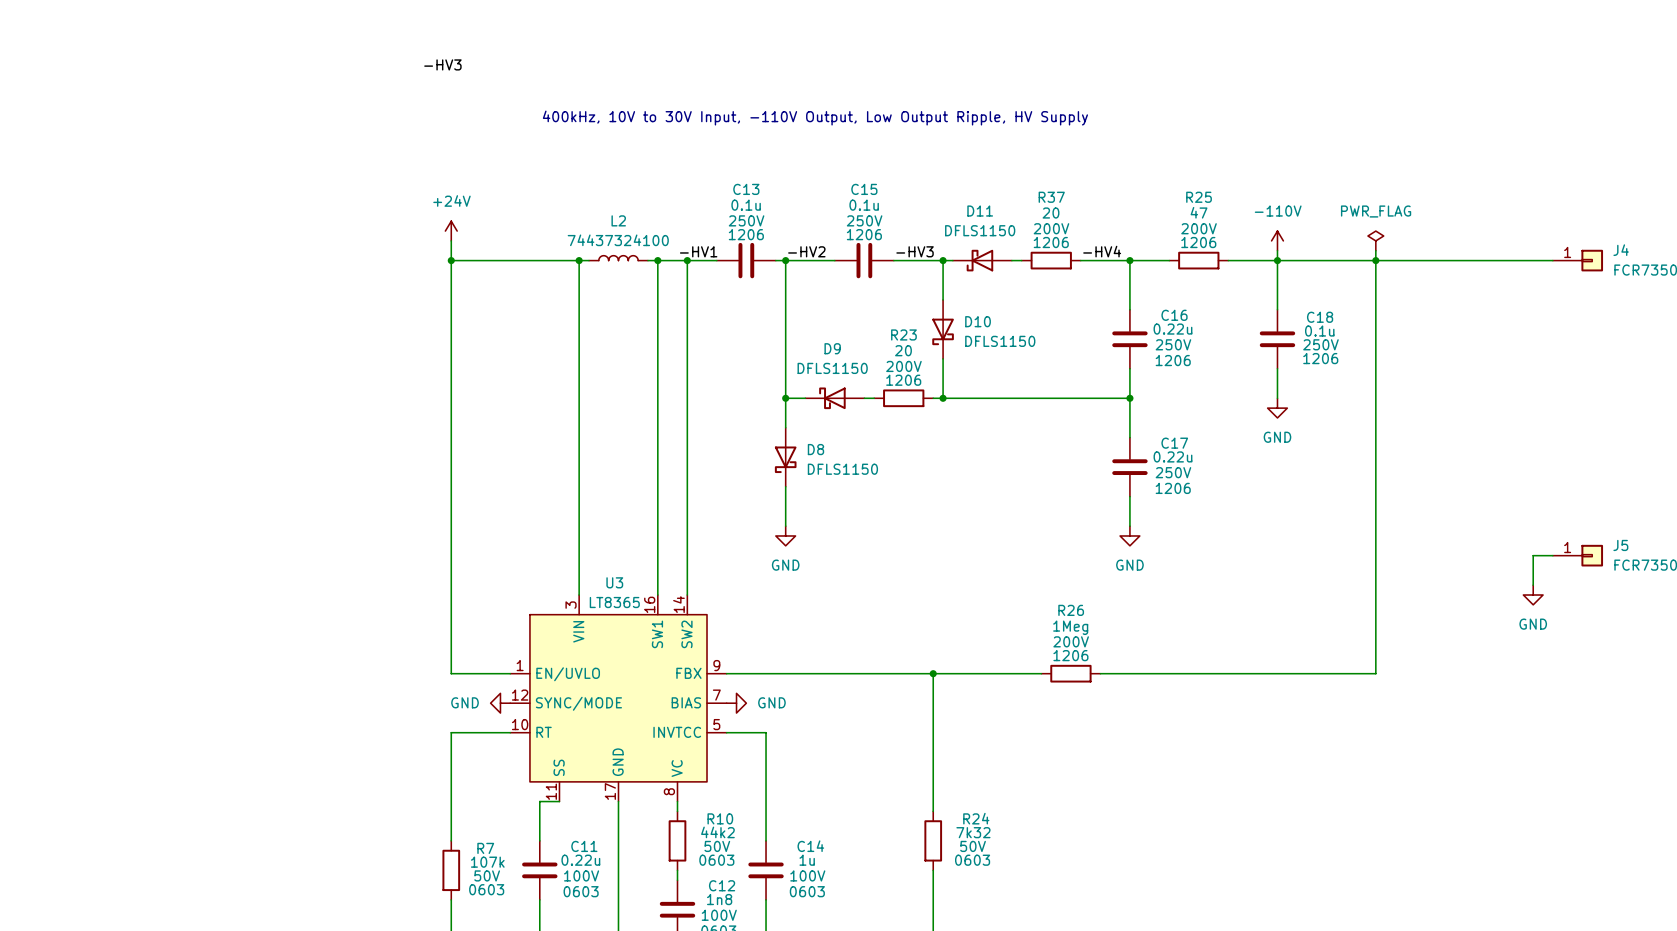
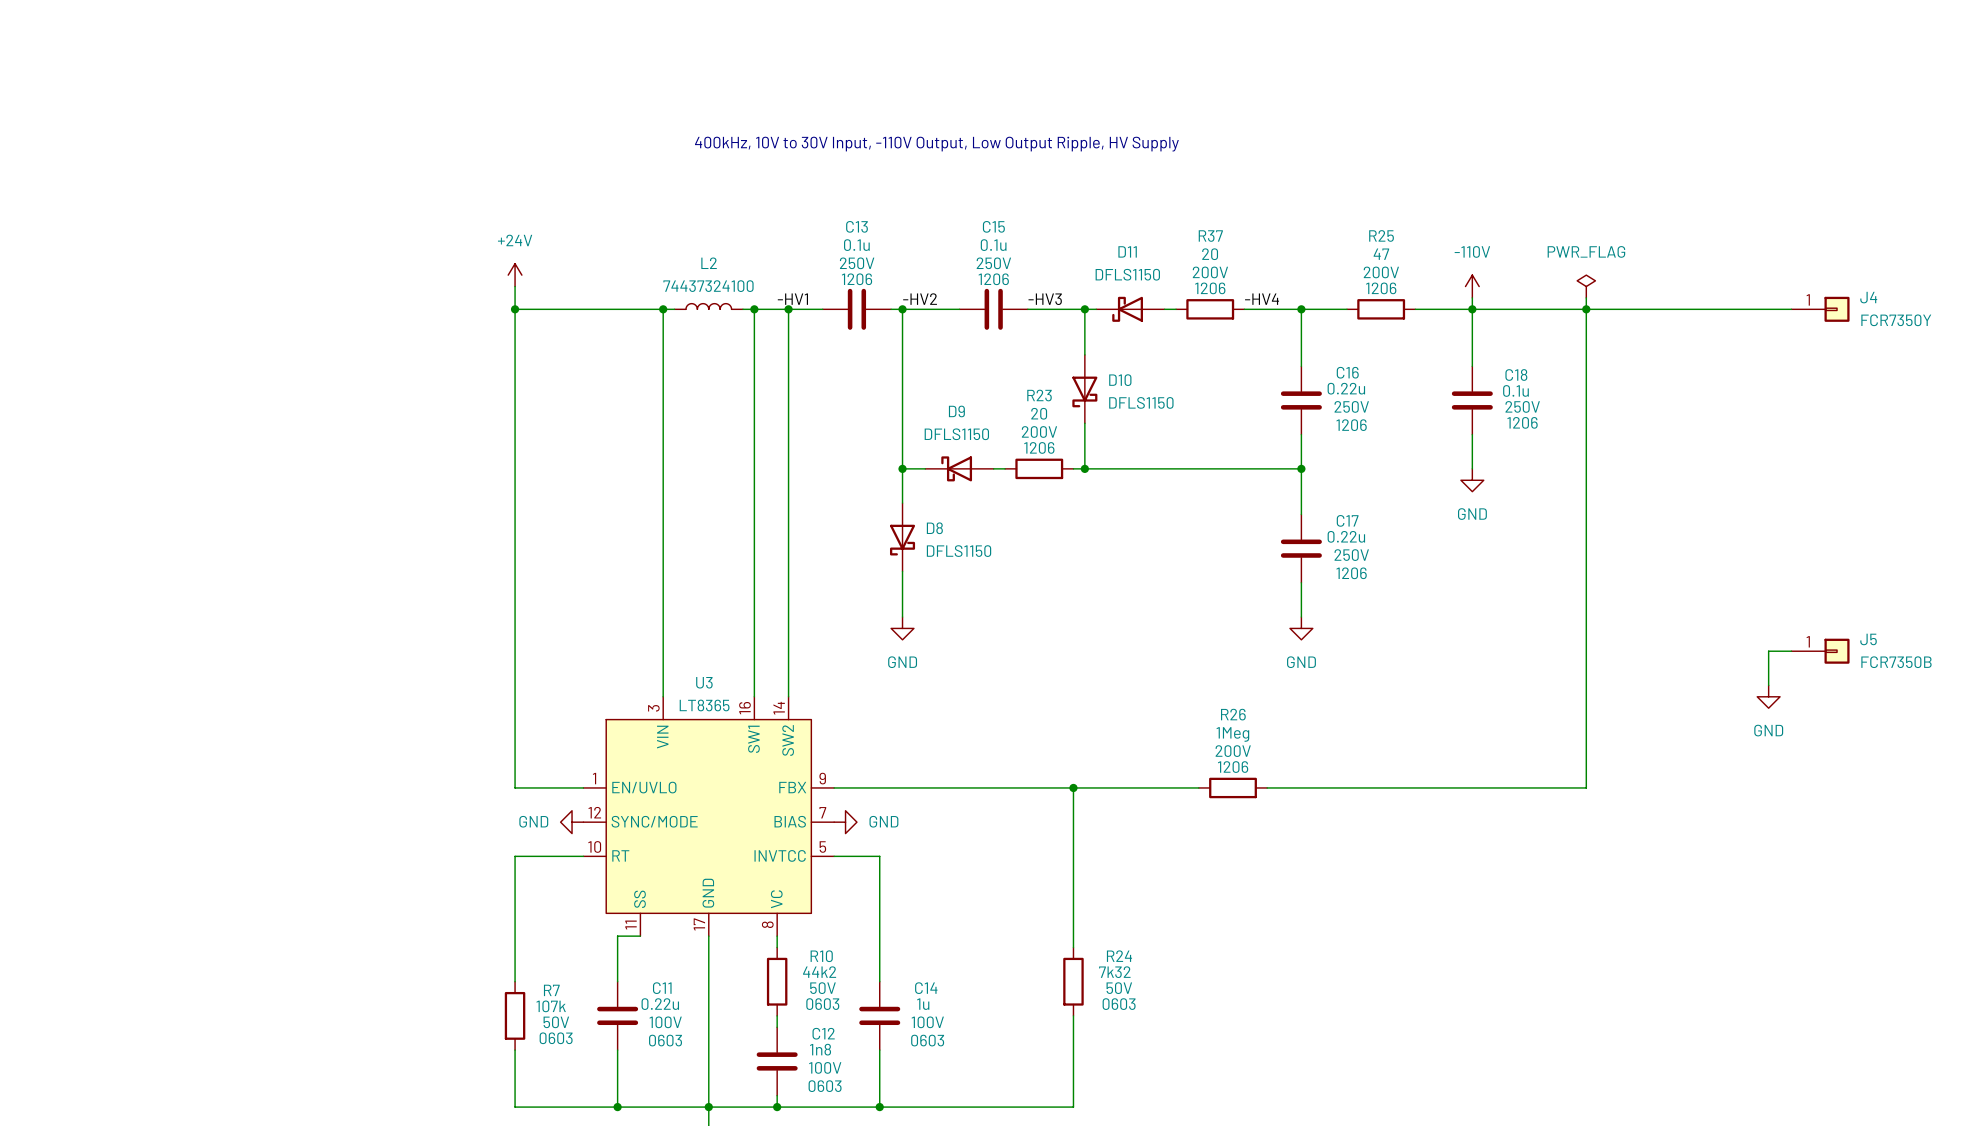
label: -HV3 (442, 64) -> none

